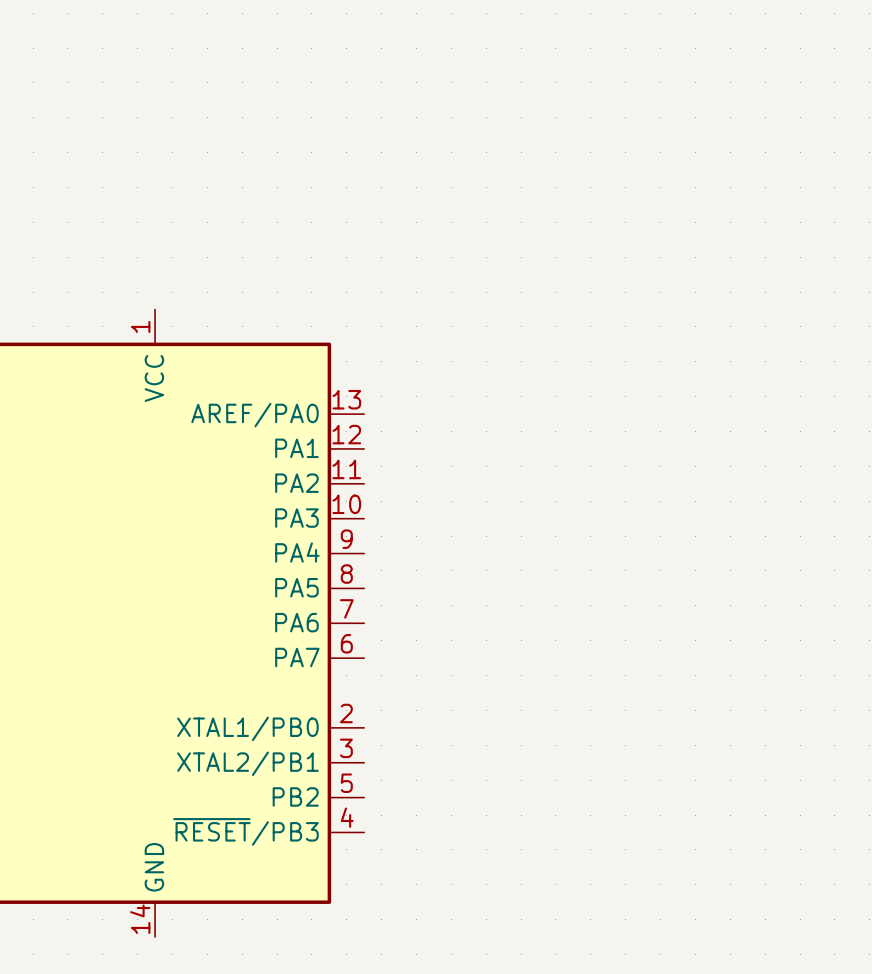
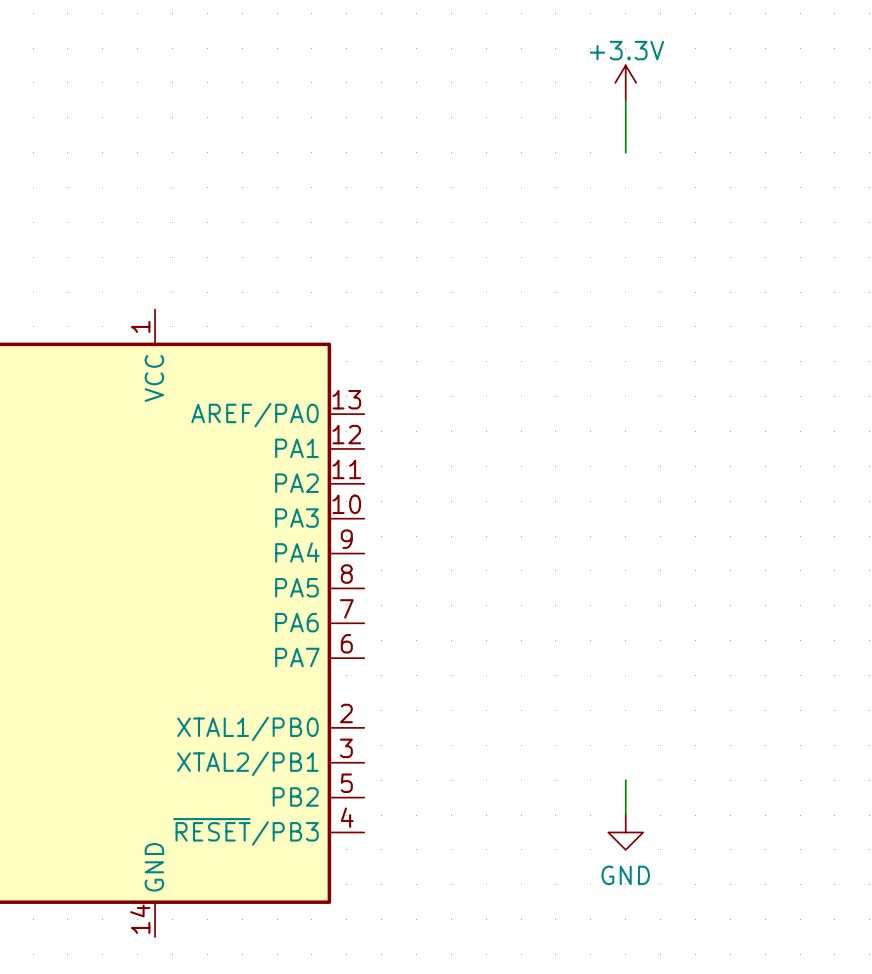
power symbol: none -> +3.3V (625, 82)
wire: none -> (625, 100) (625, 152)
wire: none -> (625, 780) (625, 815)
power symbol: none -> GND (625, 832)

